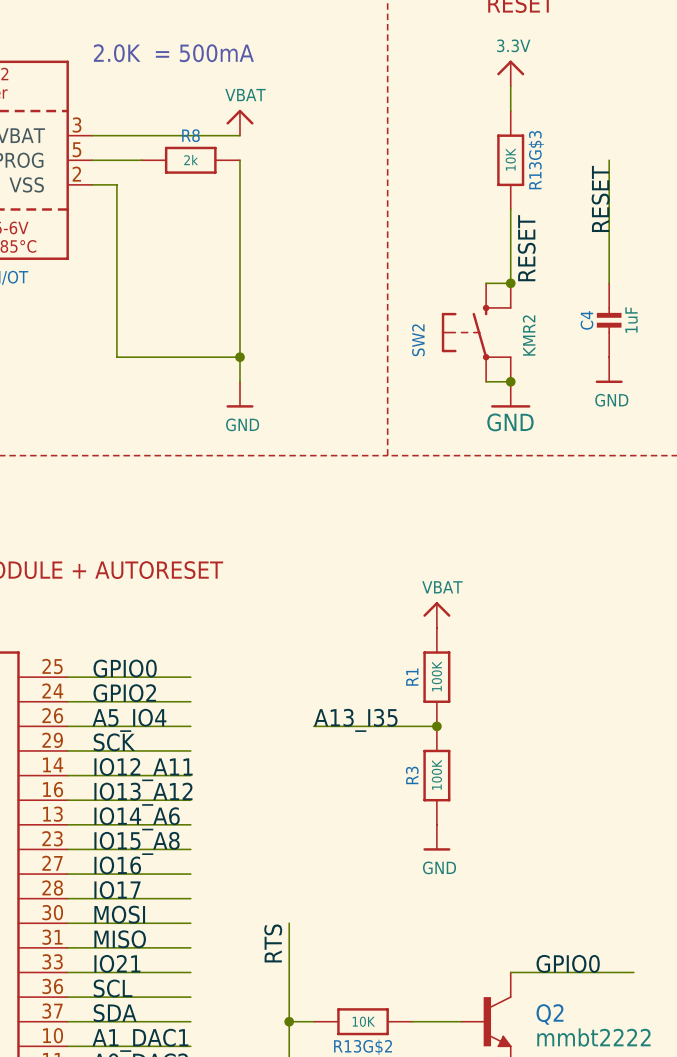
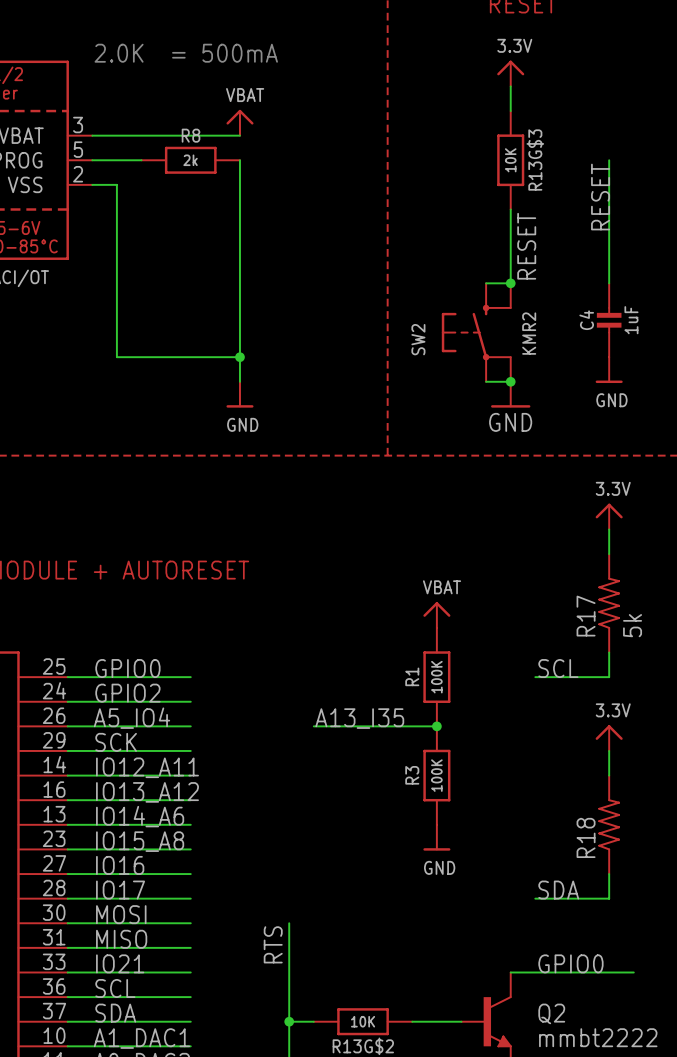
power symbol: none -> 3.3V (609, 516)
wire: none -> (609, 529) (609, 554)
R17: none -> 5k (609, 603)
wire: none -> (609, 652) (609, 677) (535, 677)
label: none -> SCL (558, 668)
power symbol: none -> 3.3V (609, 738)
wire: none -> (609, 750) (609, 775)
R18: none -> (609, 824)
wire: none -> (609, 874) (609, 898) (535, 898)
label: none -> SDA (558, 890)

